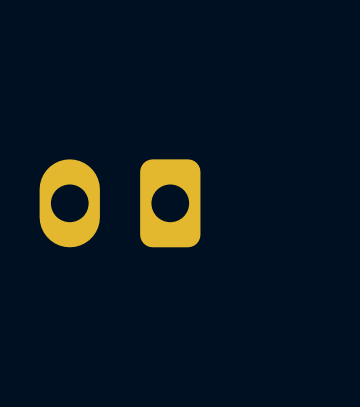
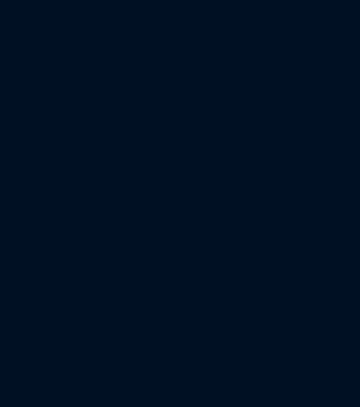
part: (120, 203) -> none

